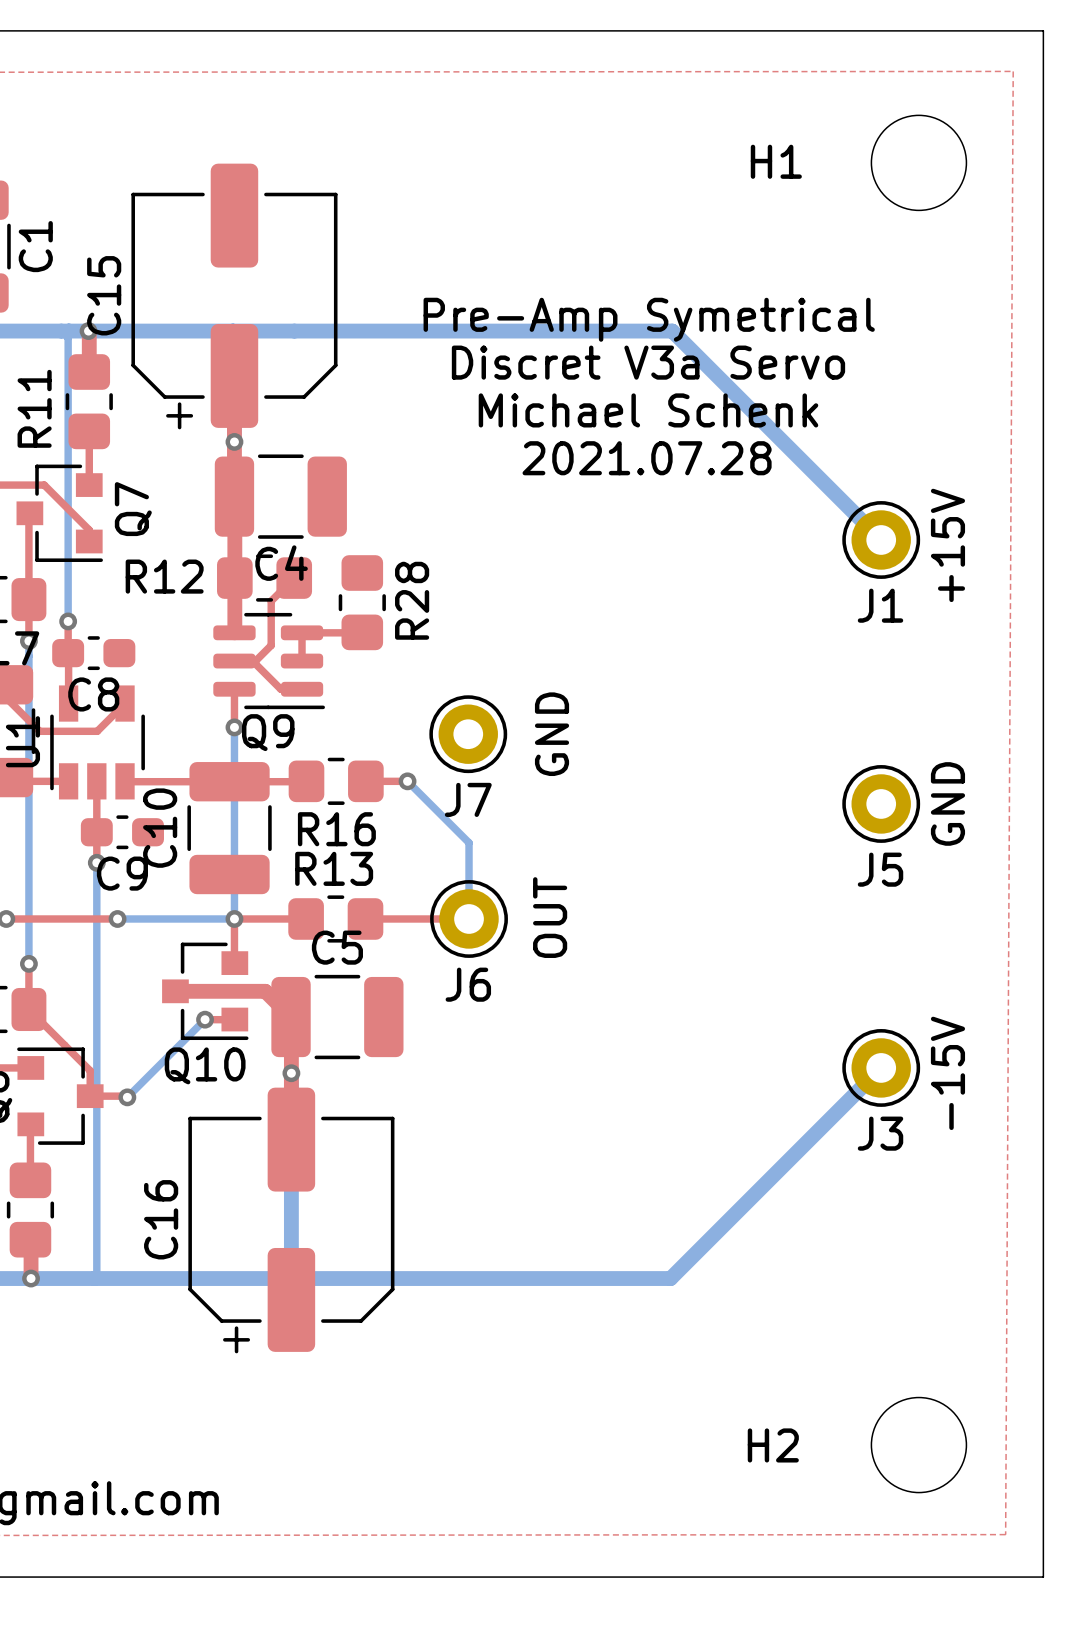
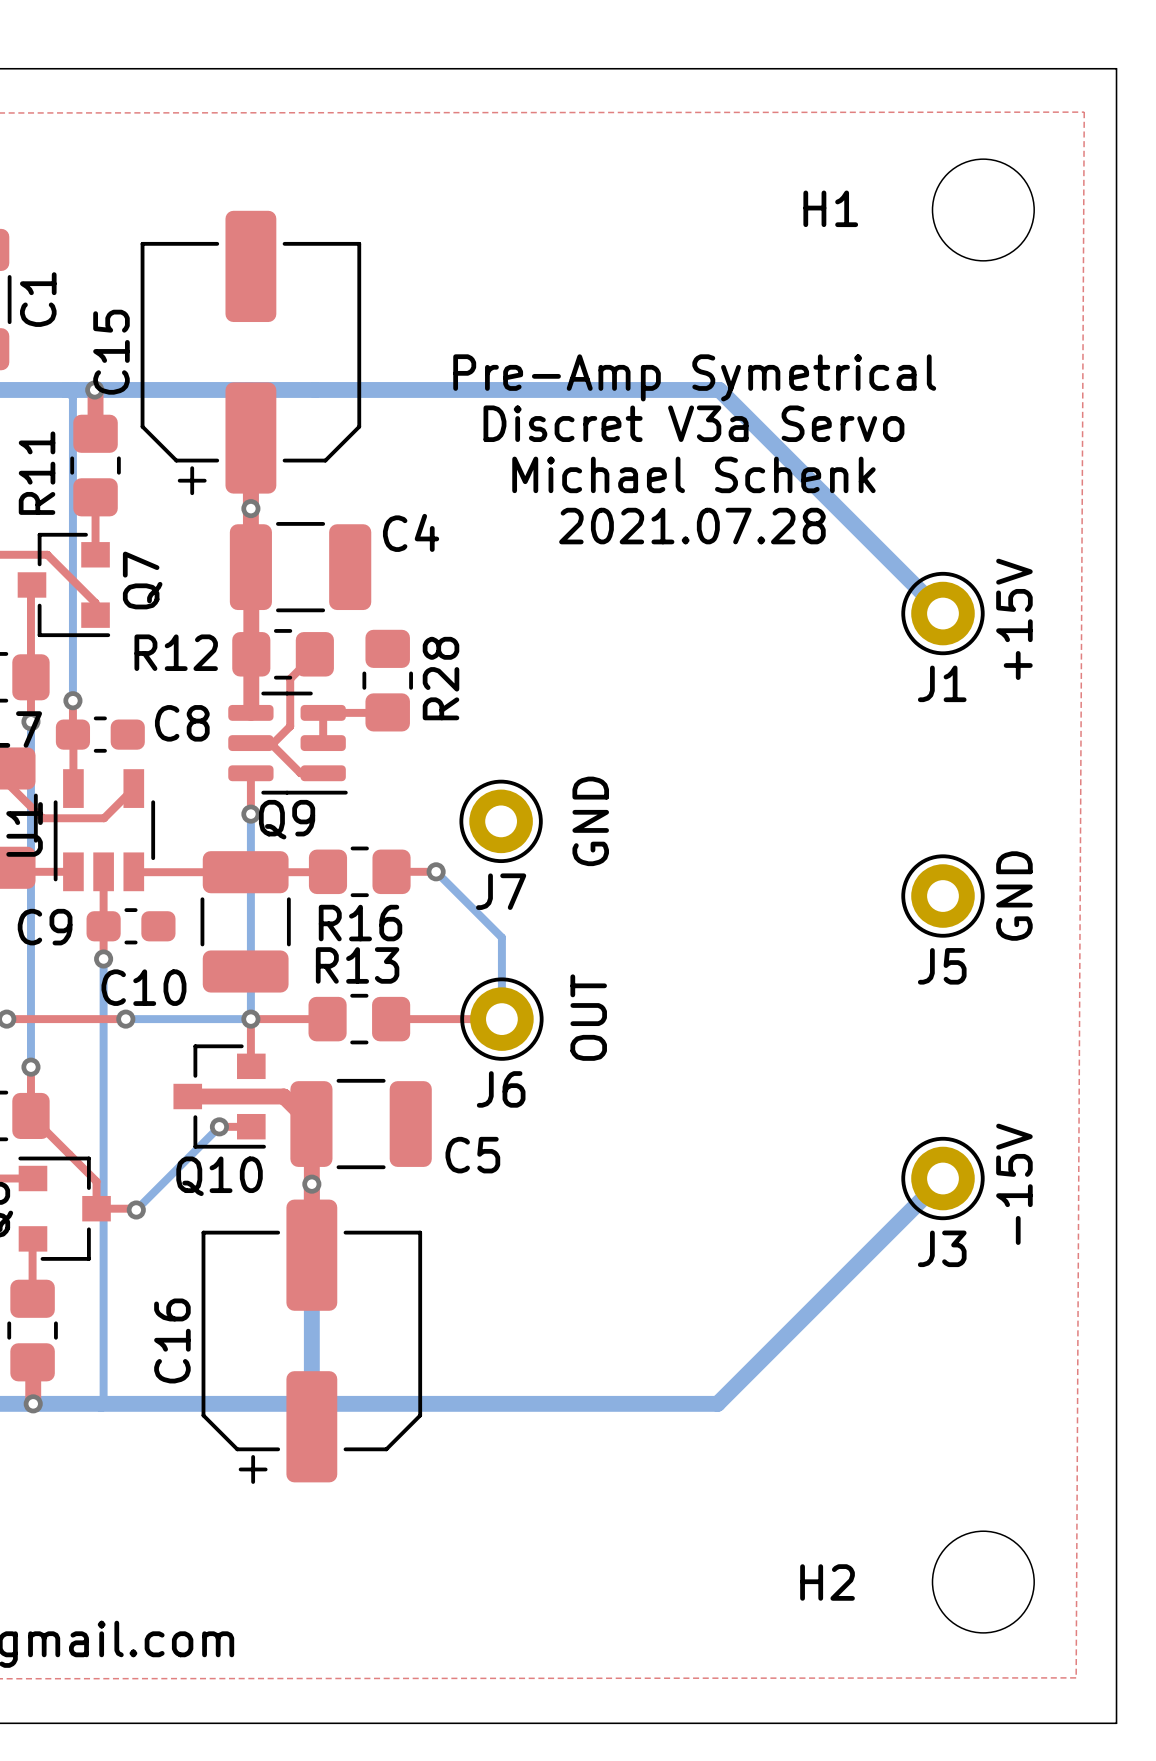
C4 name position: C4 (281, 563) -> C4 (411, 532)
C8 name position: C8 (93, 694) -> C8 (182, 723)
C10 name rotation: 0° (160, 828) -> 90° clockwise (143, 987)
C9 name position: C9 (122, 873) -> C9 (45, 927)
C5 name position: C5 (337, 947) -> C5 (472, 1155)

